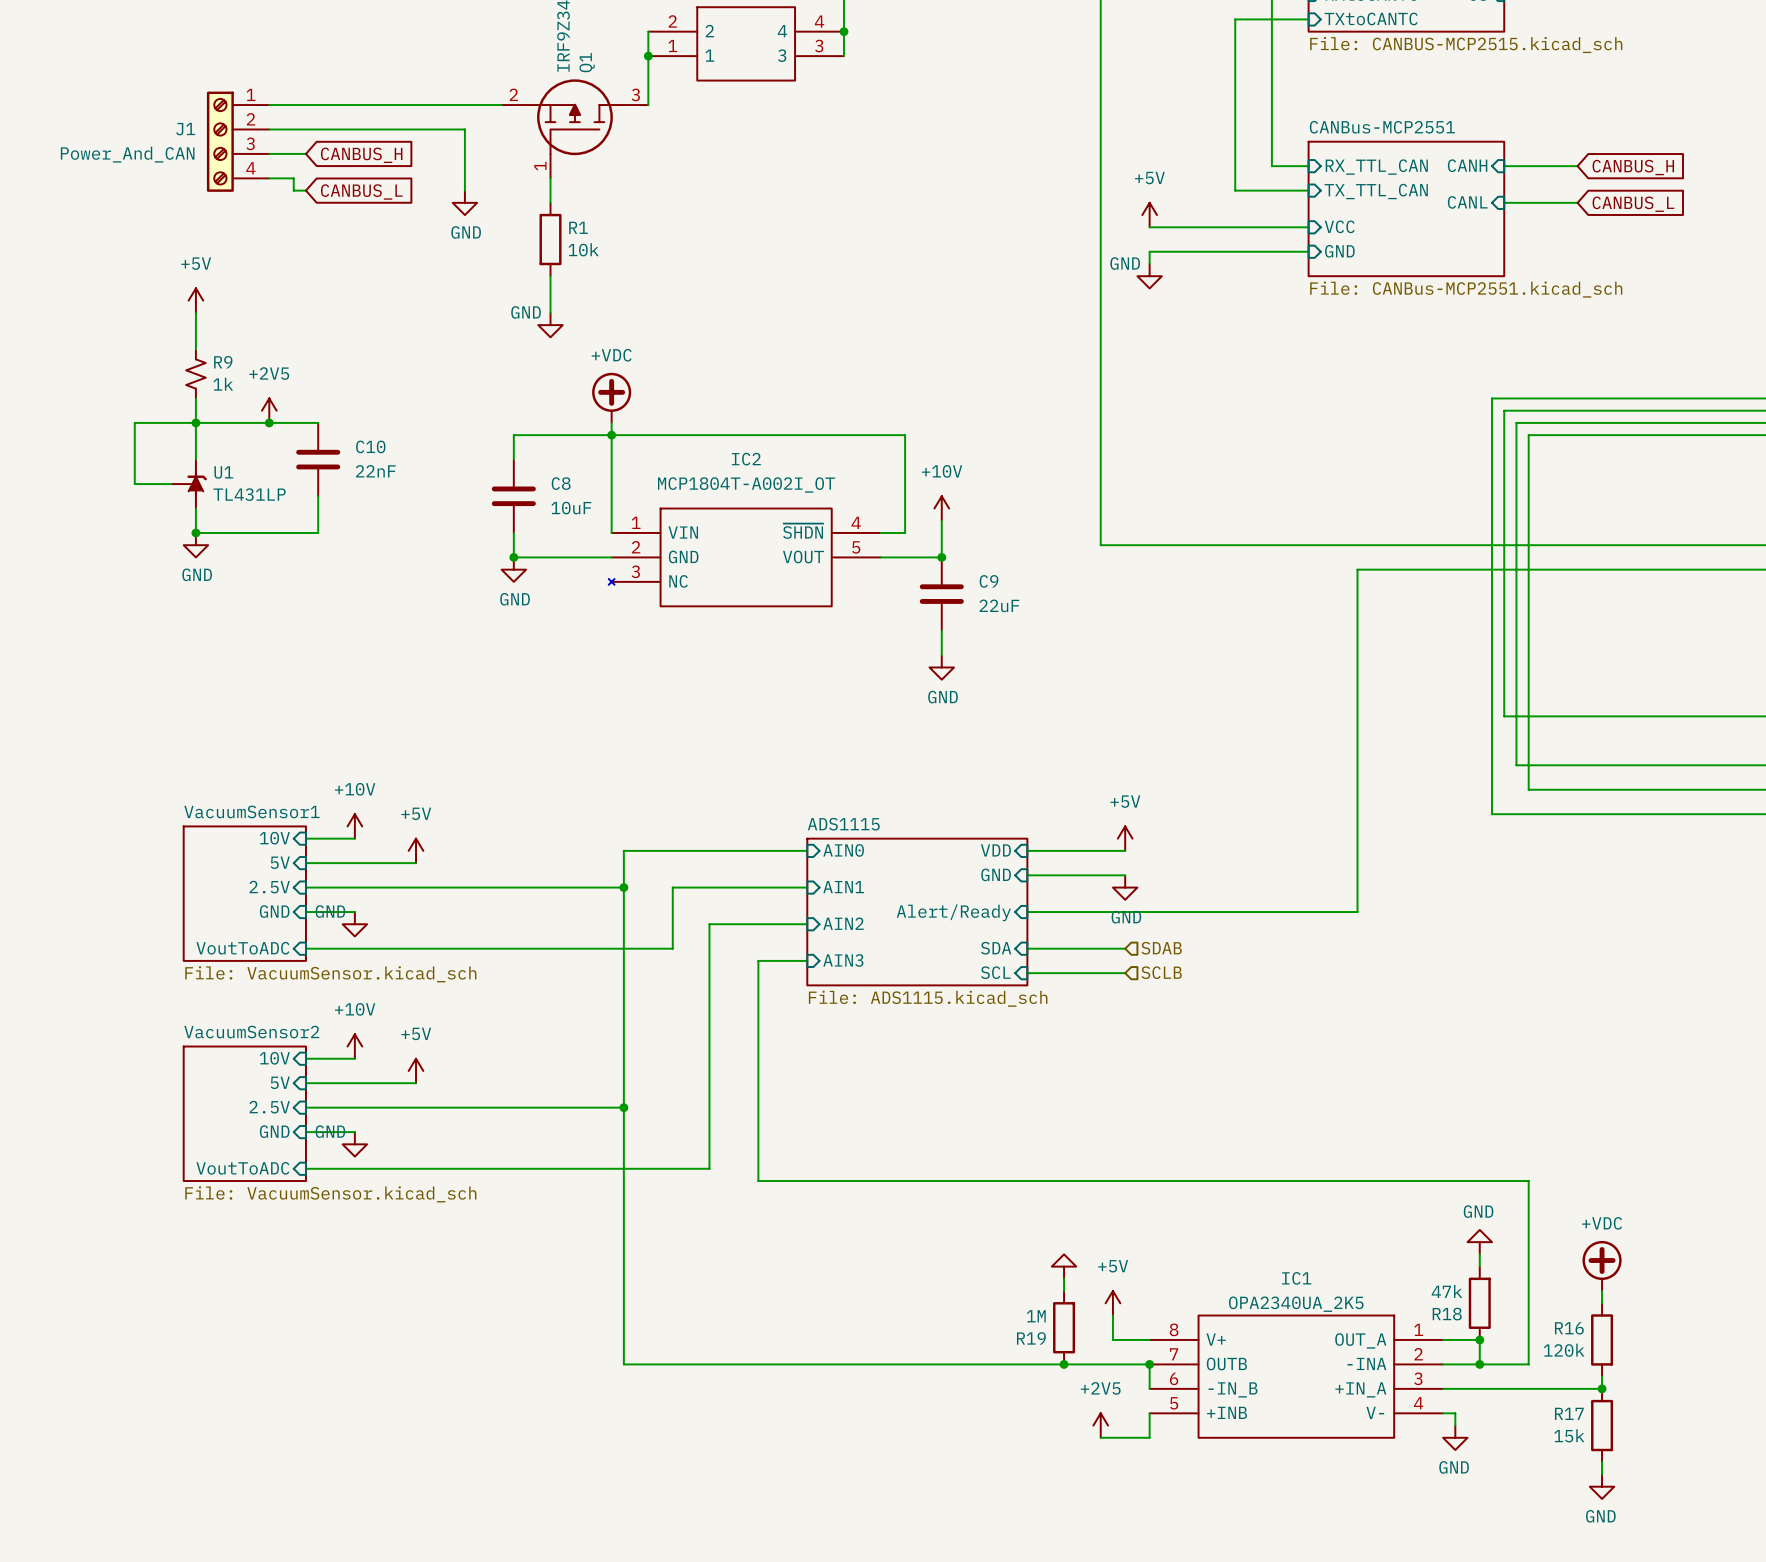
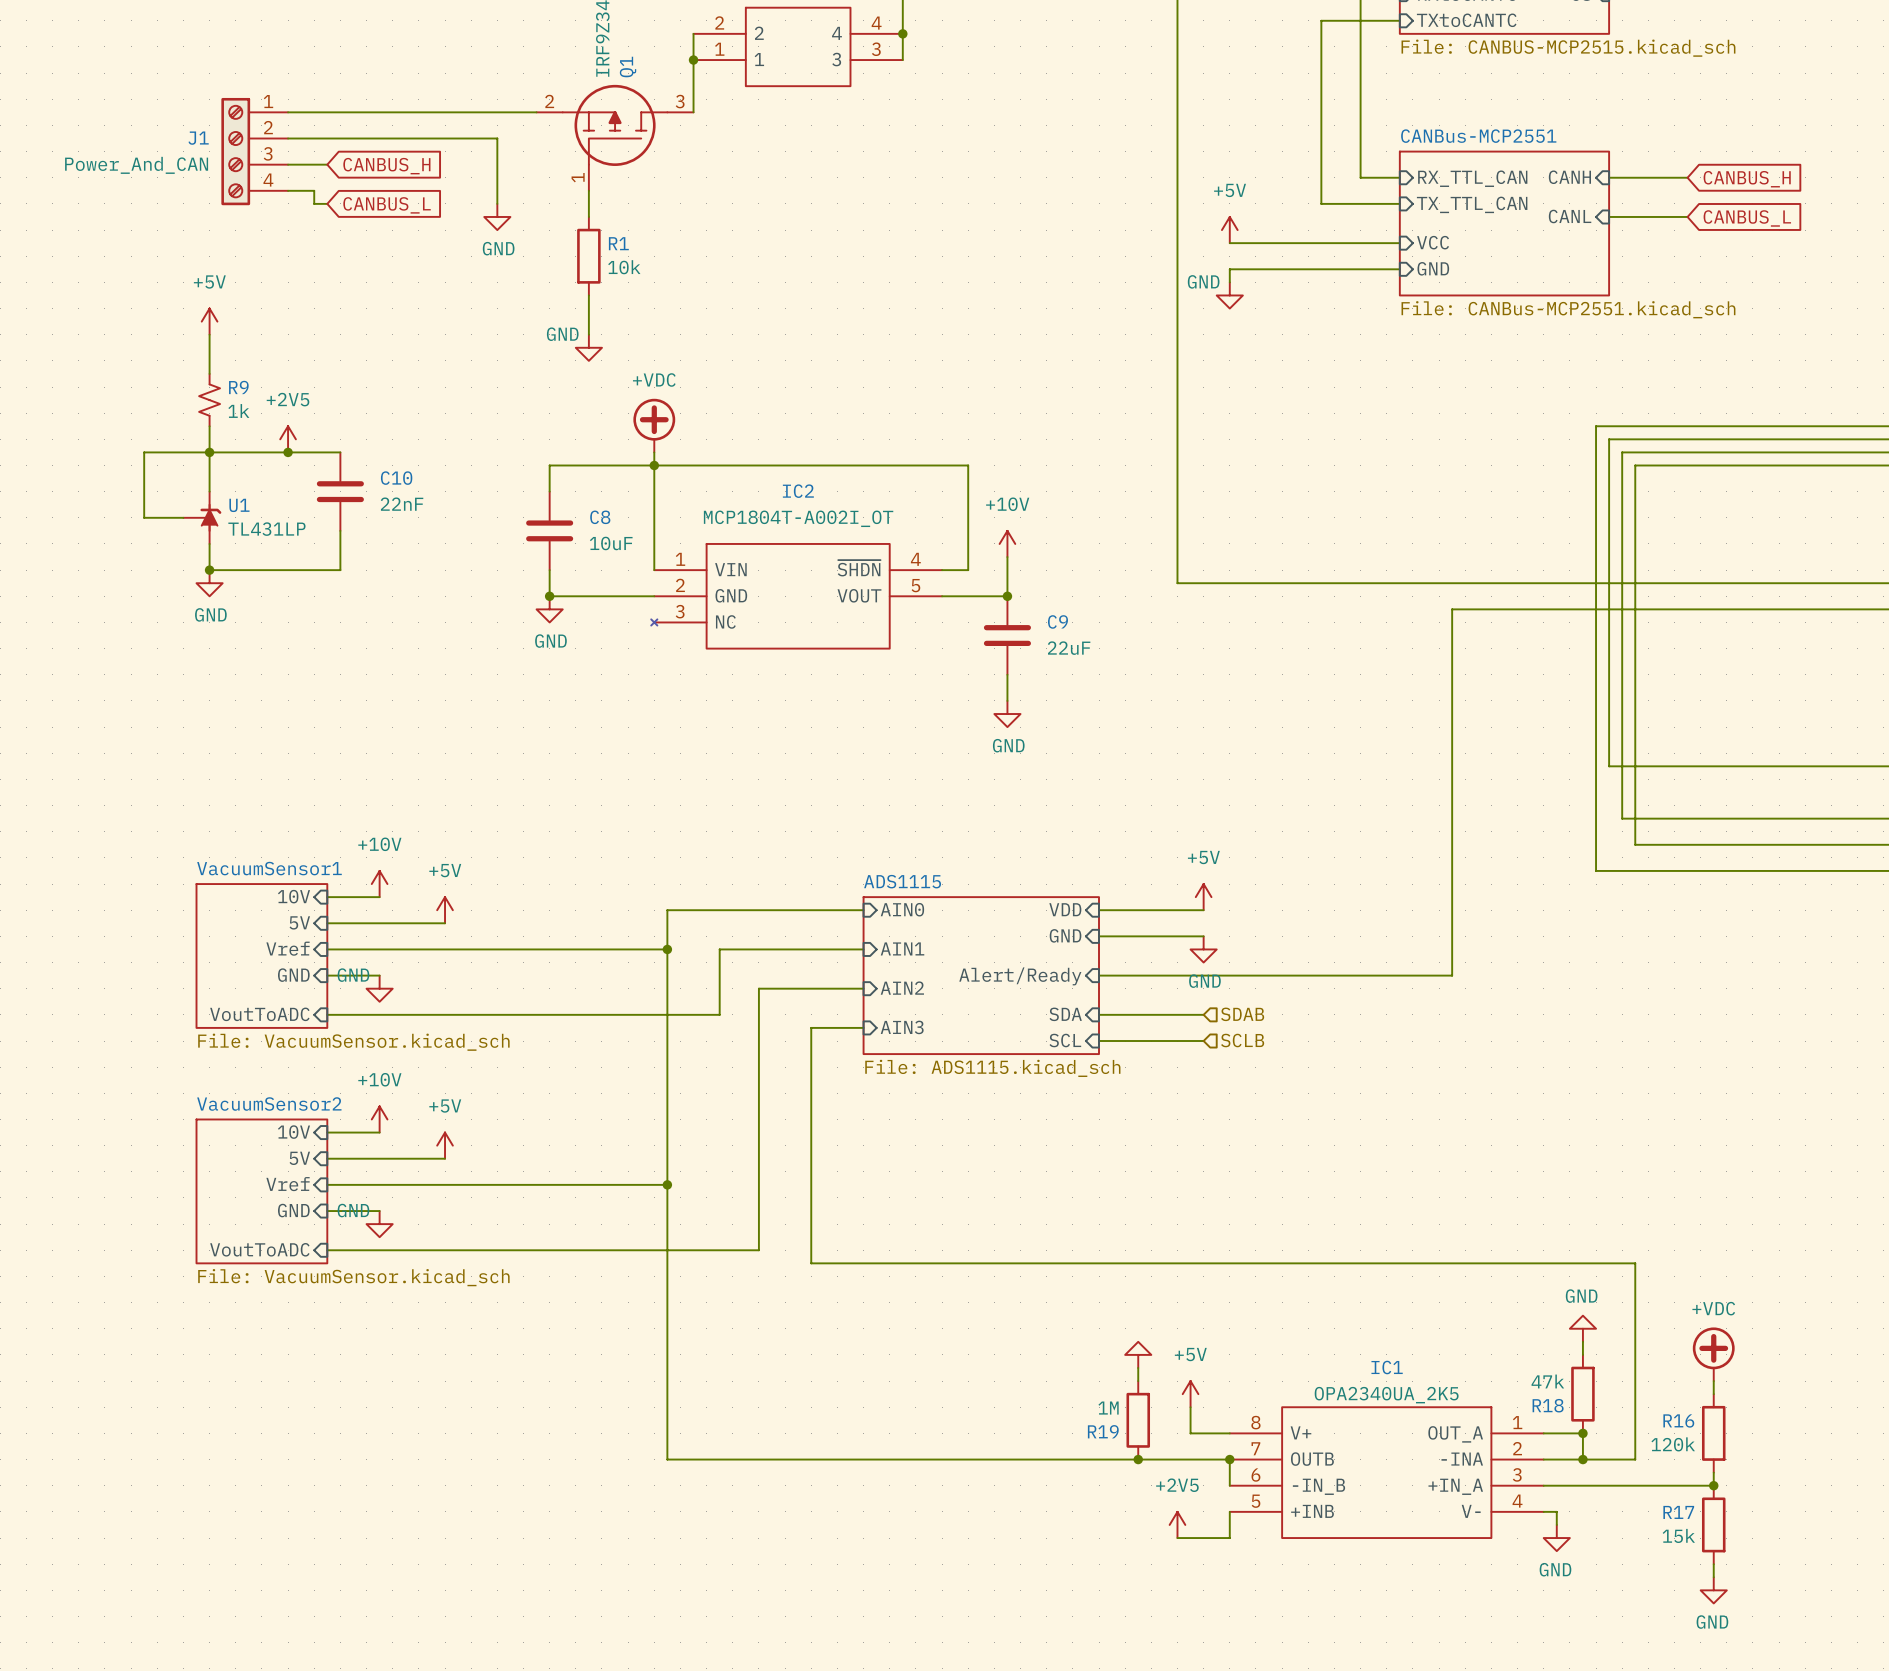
sheet pin: 2.5V (269, 887) -> Vref (288, 948)
sheet pin: 2.5V (269, 1107) -> Vref (288, 1184)

